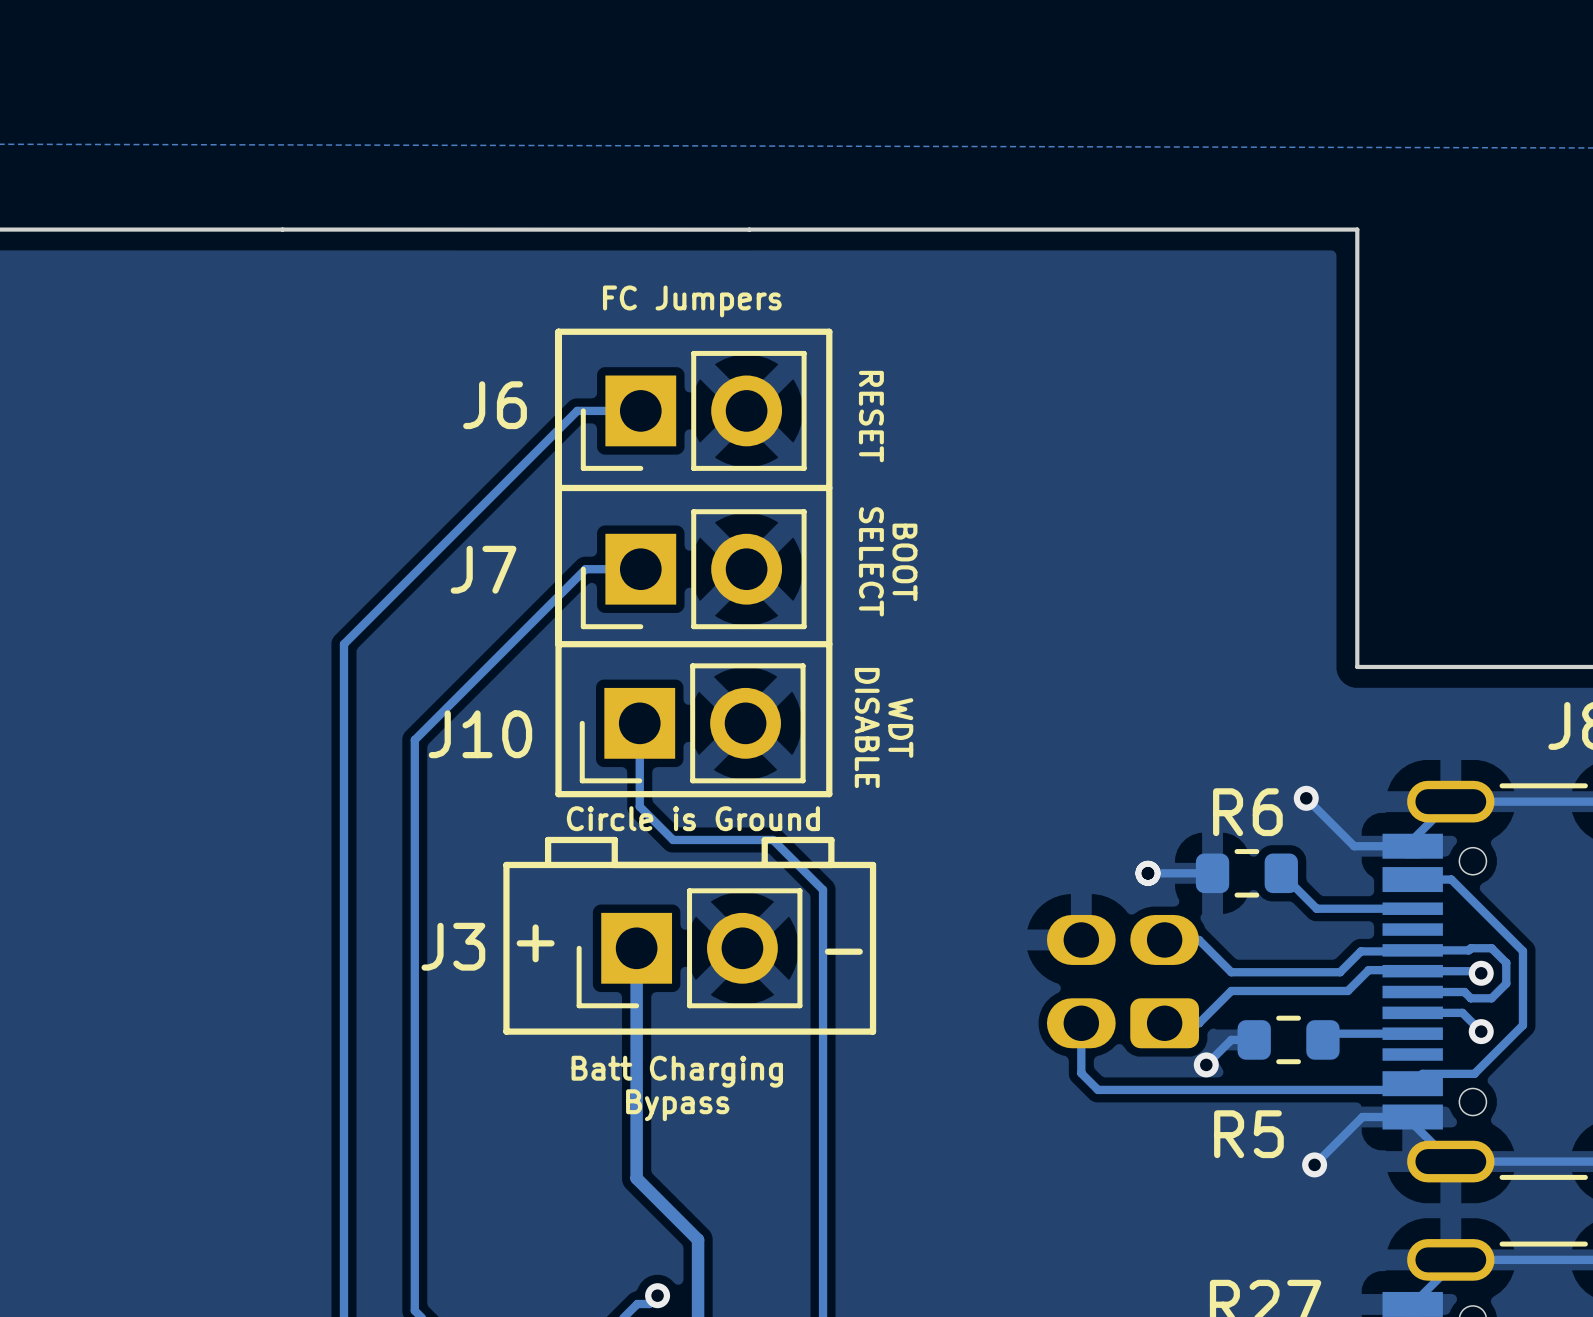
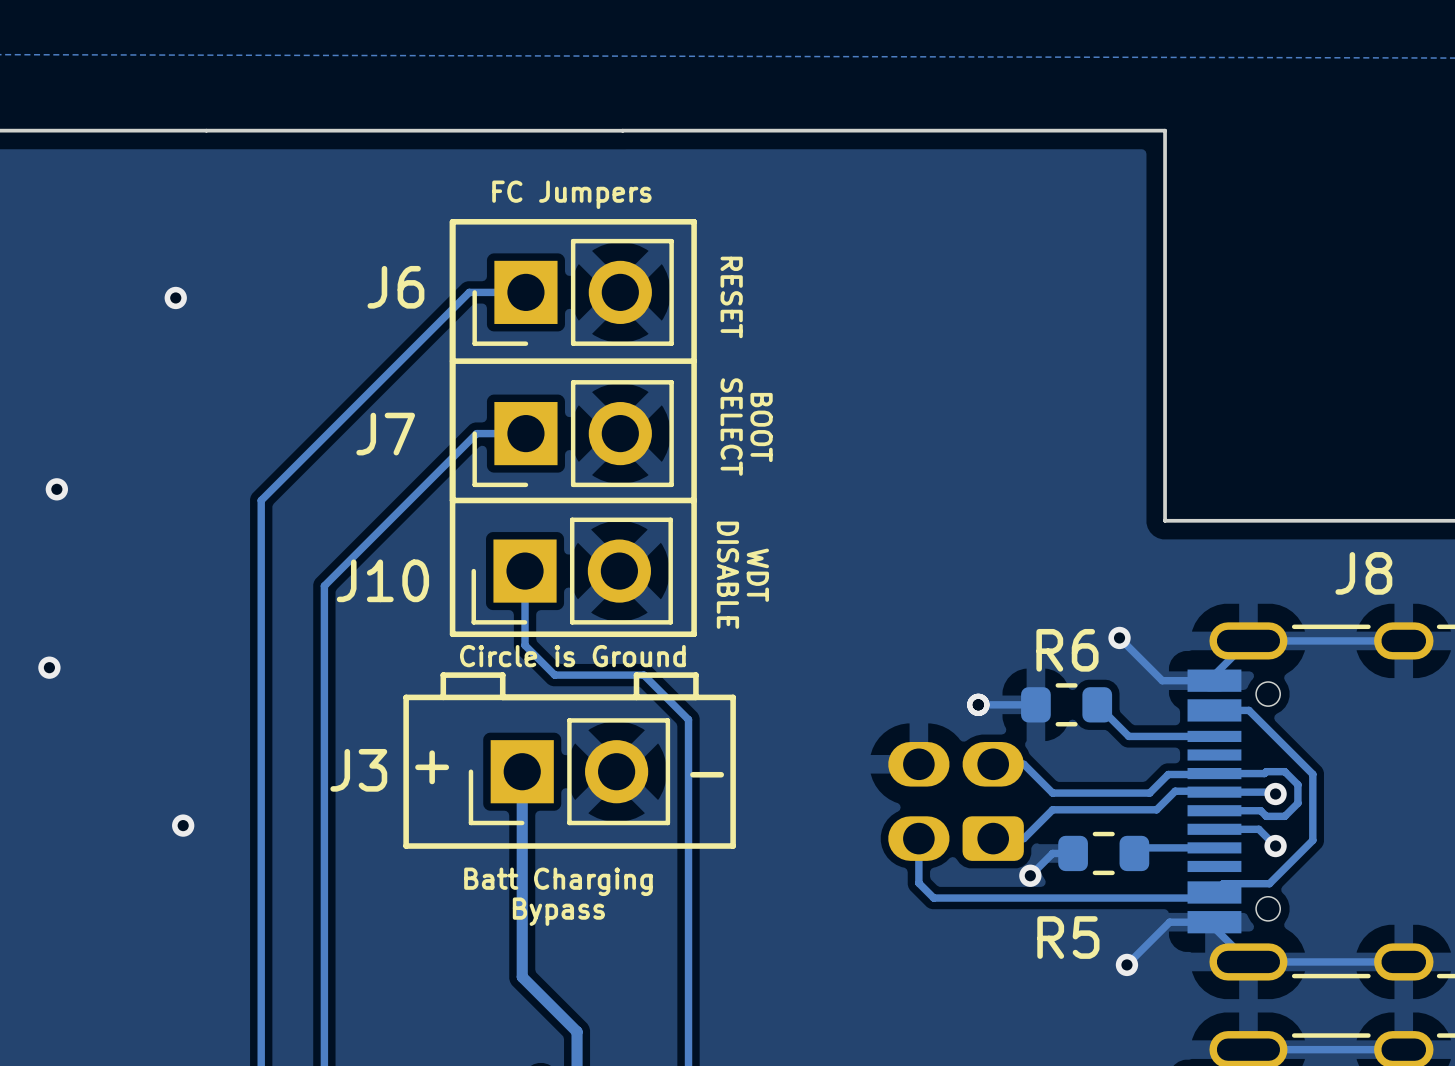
via: none -> (175, 297)
via: none -> (56, 489)
via: none -> (49, 667)
via: none -> (183, 825)

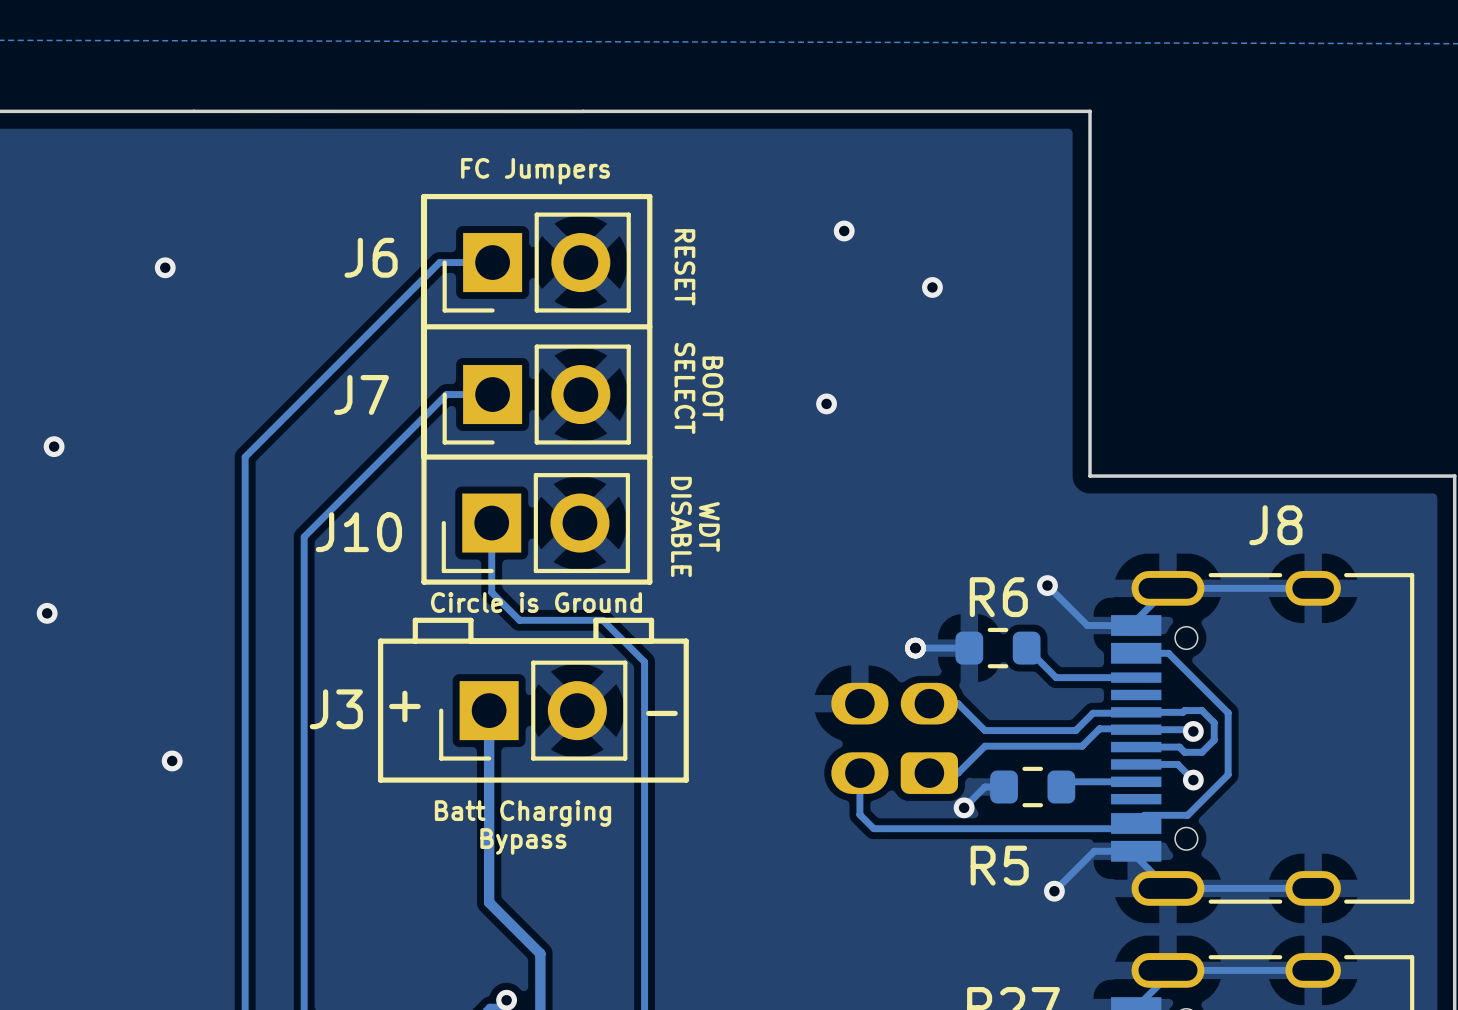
via: none -> (844, 231)
via: none -> (932, 287)
via: none -> (826, 403)

